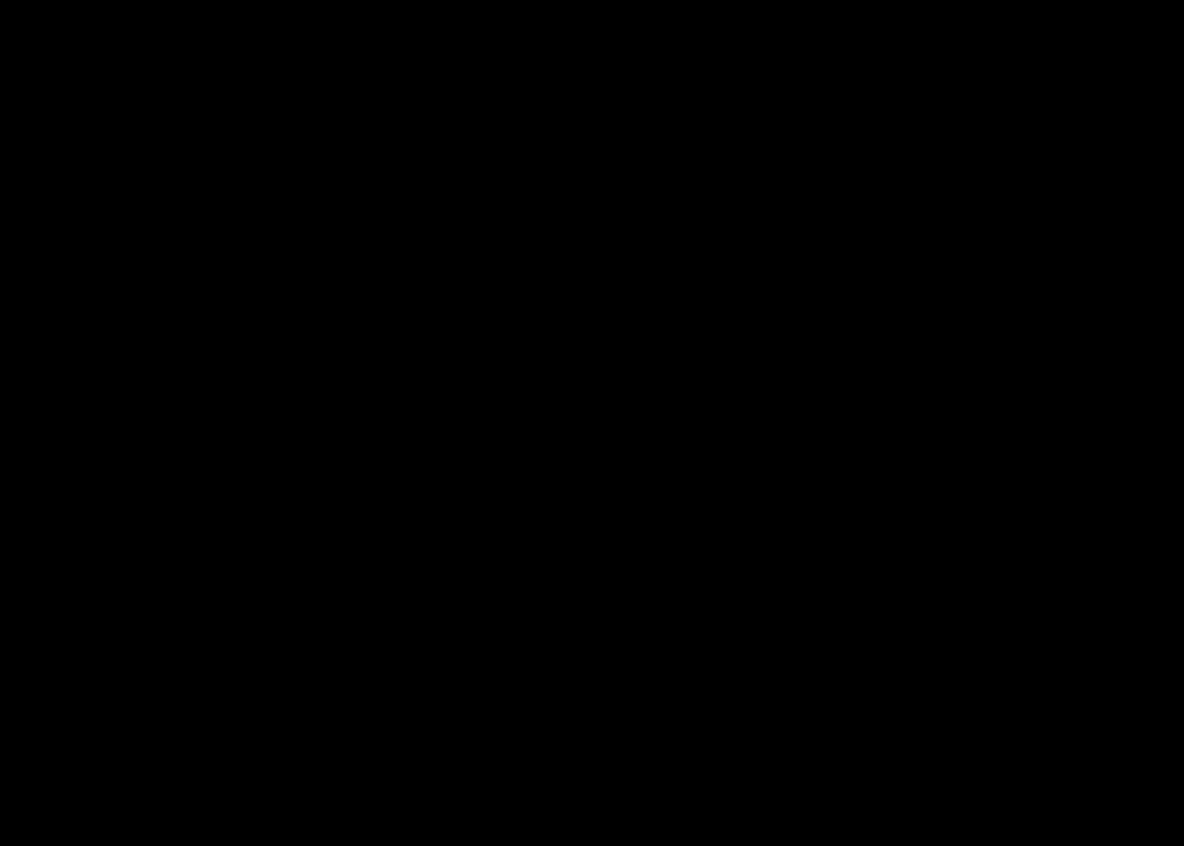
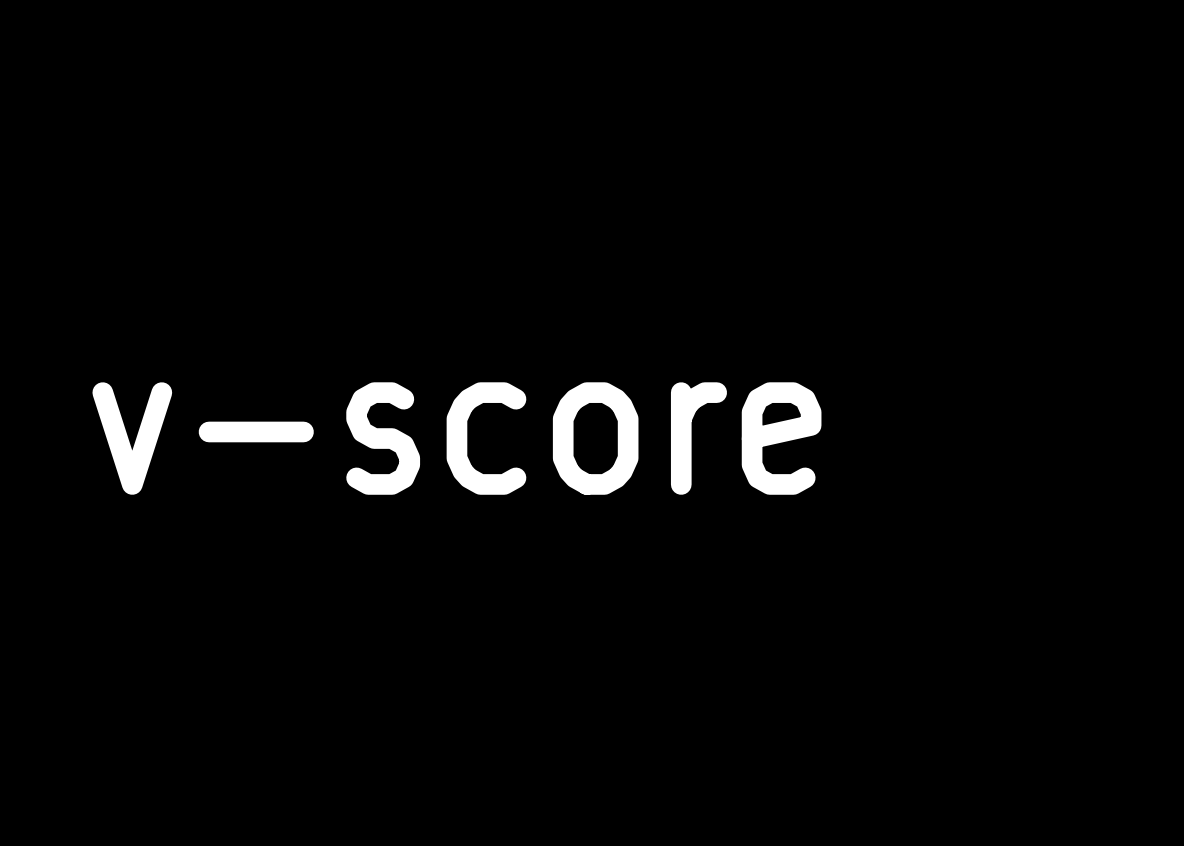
text: none -> v-score (456, 438)

